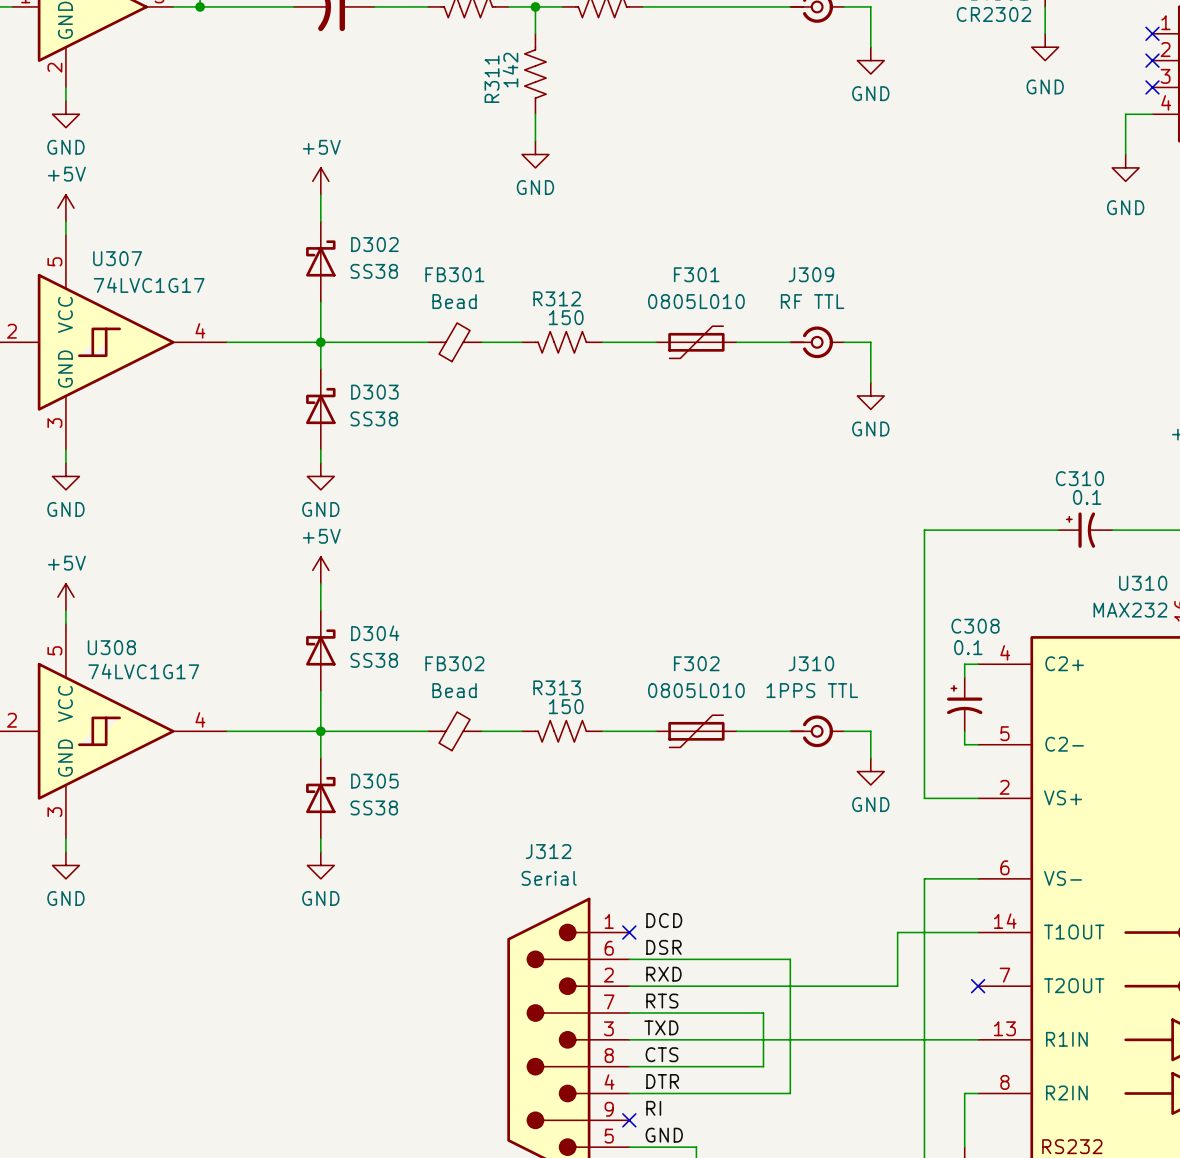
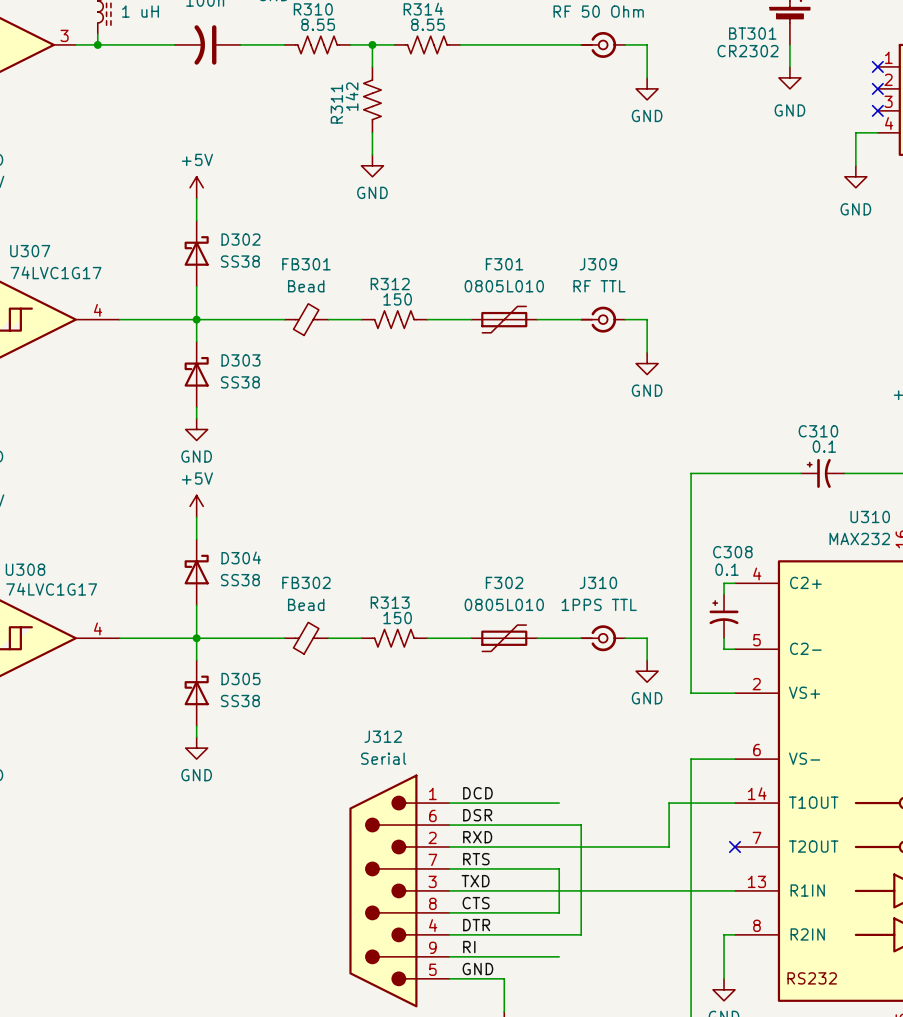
wire: none -> (449, 803) (559, 803)
no-connect mark: (629, 932) -> none
wire: none -> (449, 956) (559, 956)
no-connect mark: (629, 1120) -> none

